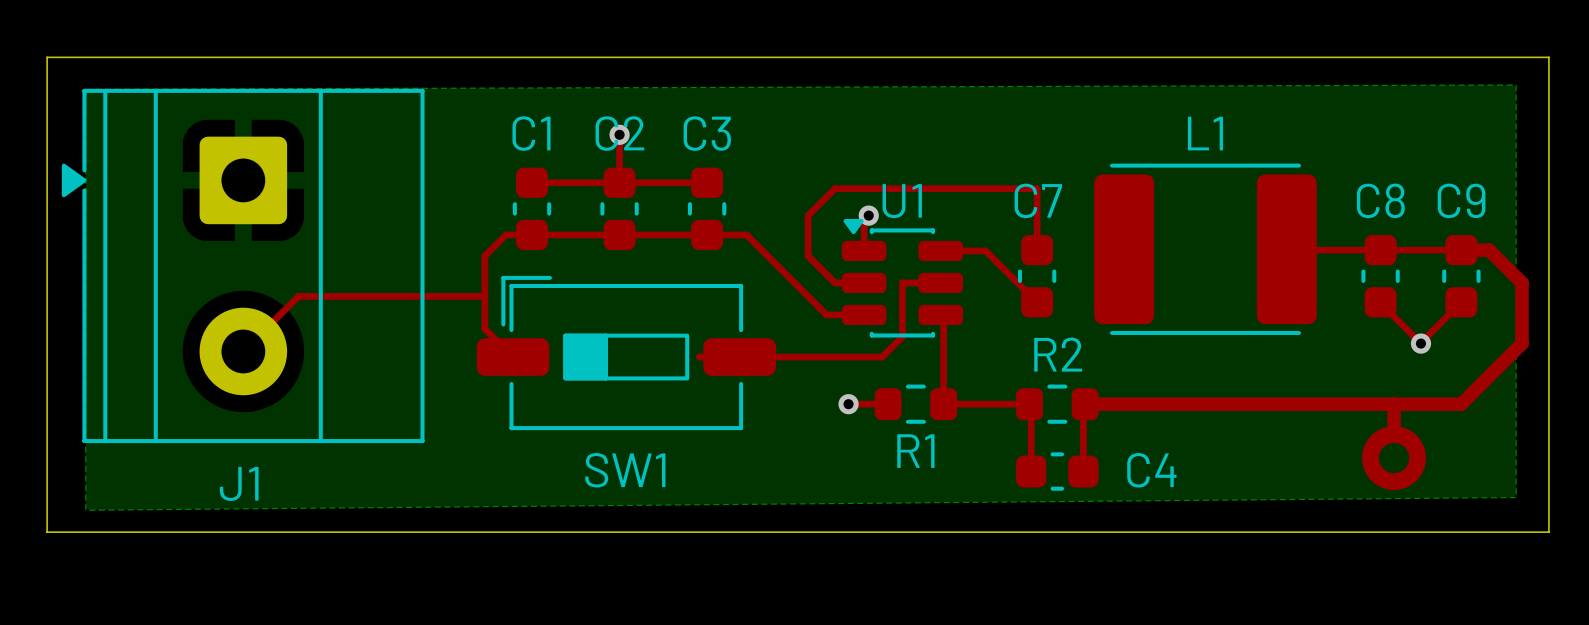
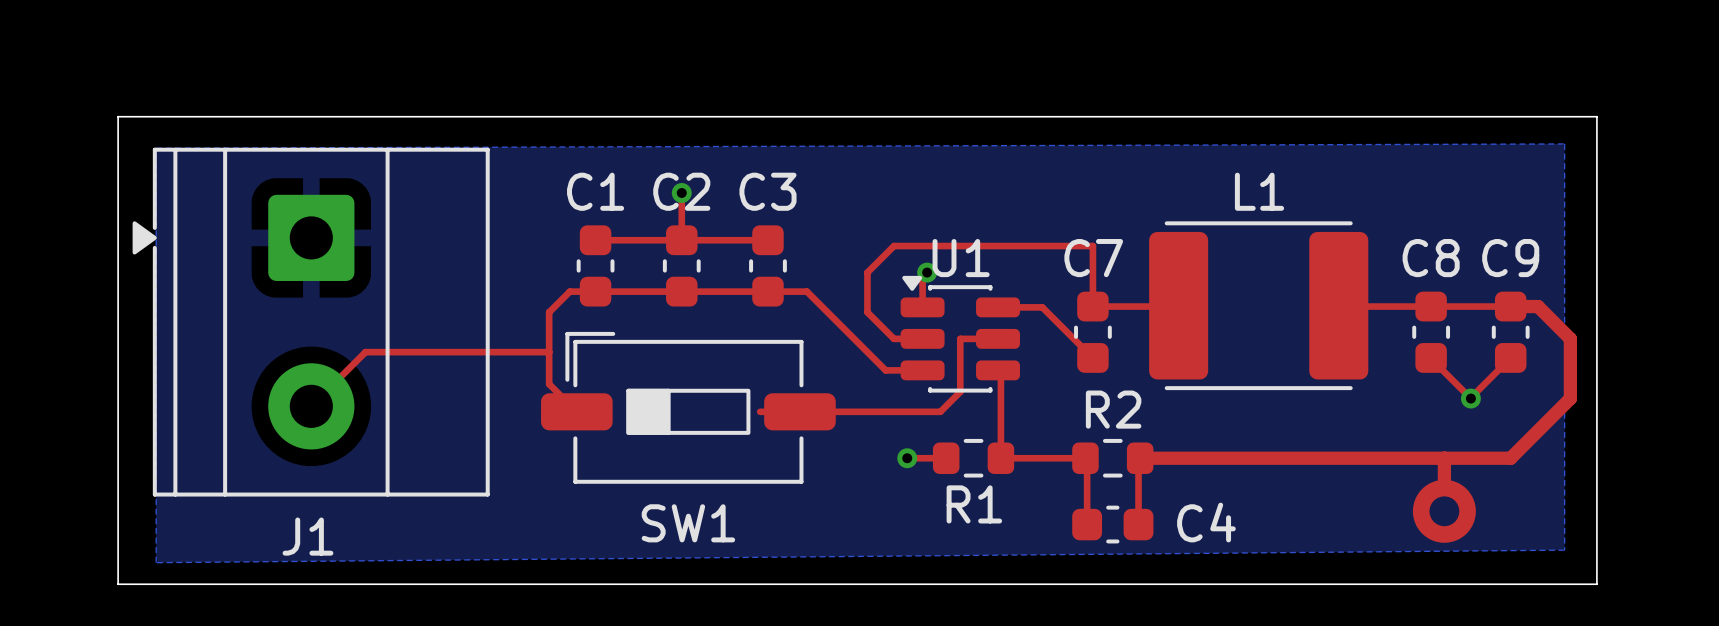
top track: none -> (1178, 305) (1092, 306)

